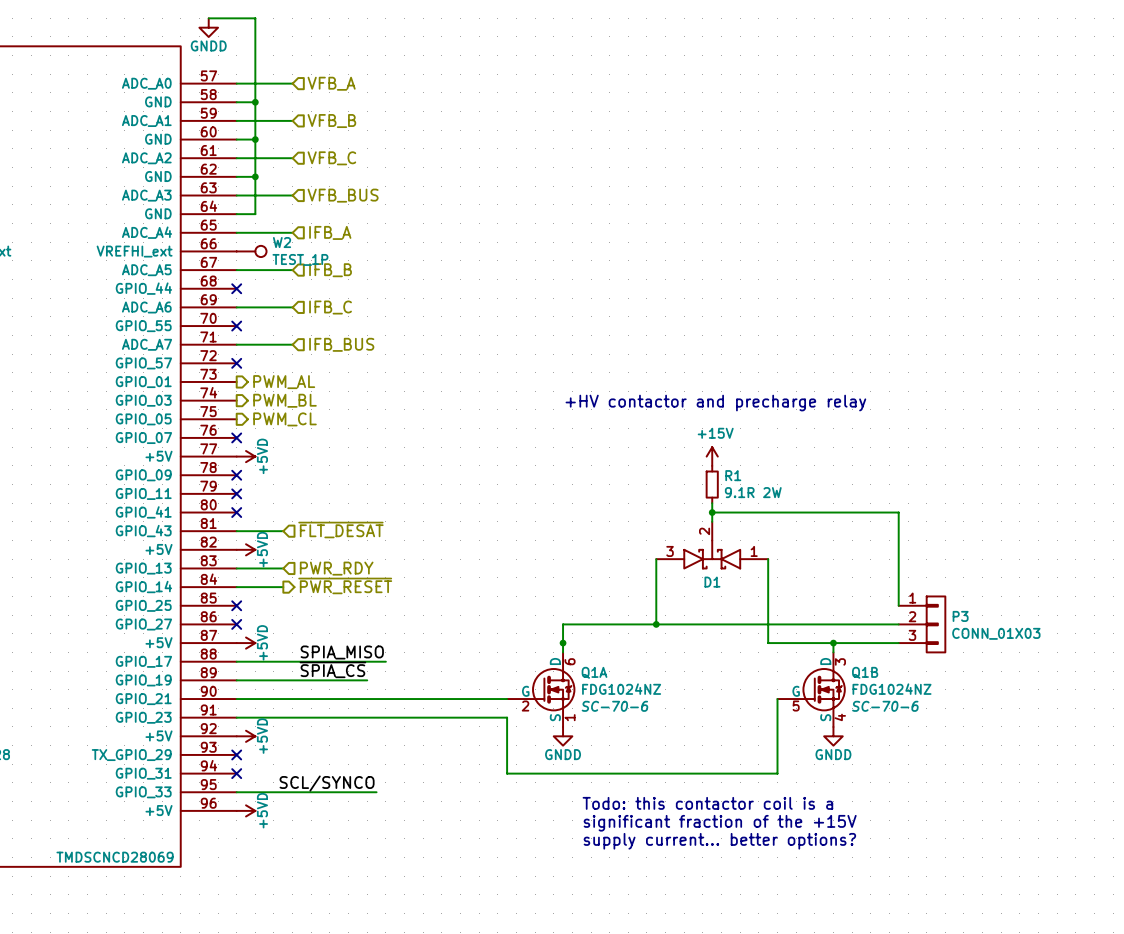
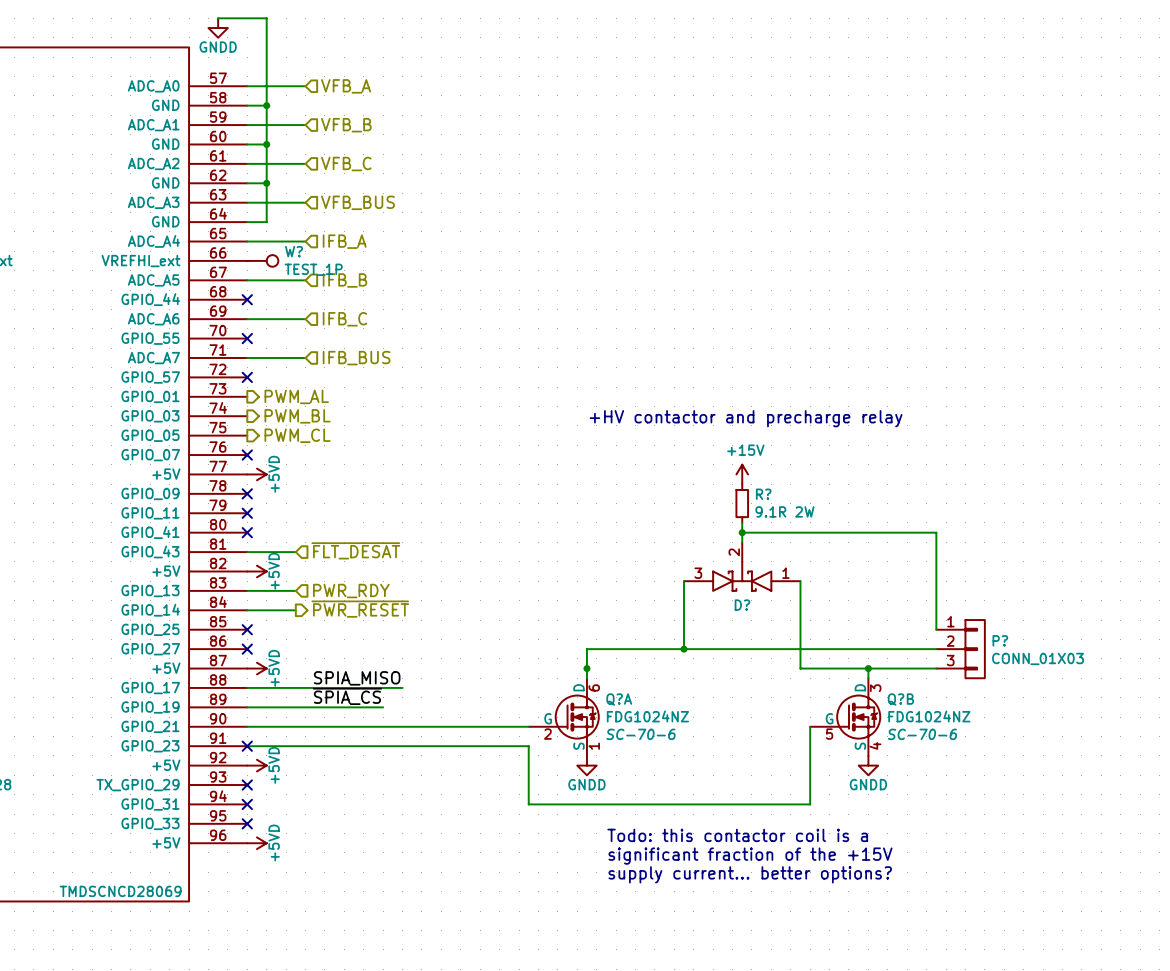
W2 name: W2 (282, 242) -> W? (294, 251)
R1 name: R1 (733, 475) -> R? (763, 494)
D1 name: D1 (712, 582) -> D? (742, 605)
P3 name: P3 (960, 616) -> P? (1000, 640)
Q1A name: Q1A (594, 672) -> Q?A (619, 699)
Q1B name: Q1B (865, 672) -> Q?B (900, 699)
no-connect mark: none -> (247, 746)
label: SCL/SYNCO (327, 783) -> none
wire: (236, 792) (376, 792) -> none
no-connect mark: none -> (247, 823)

